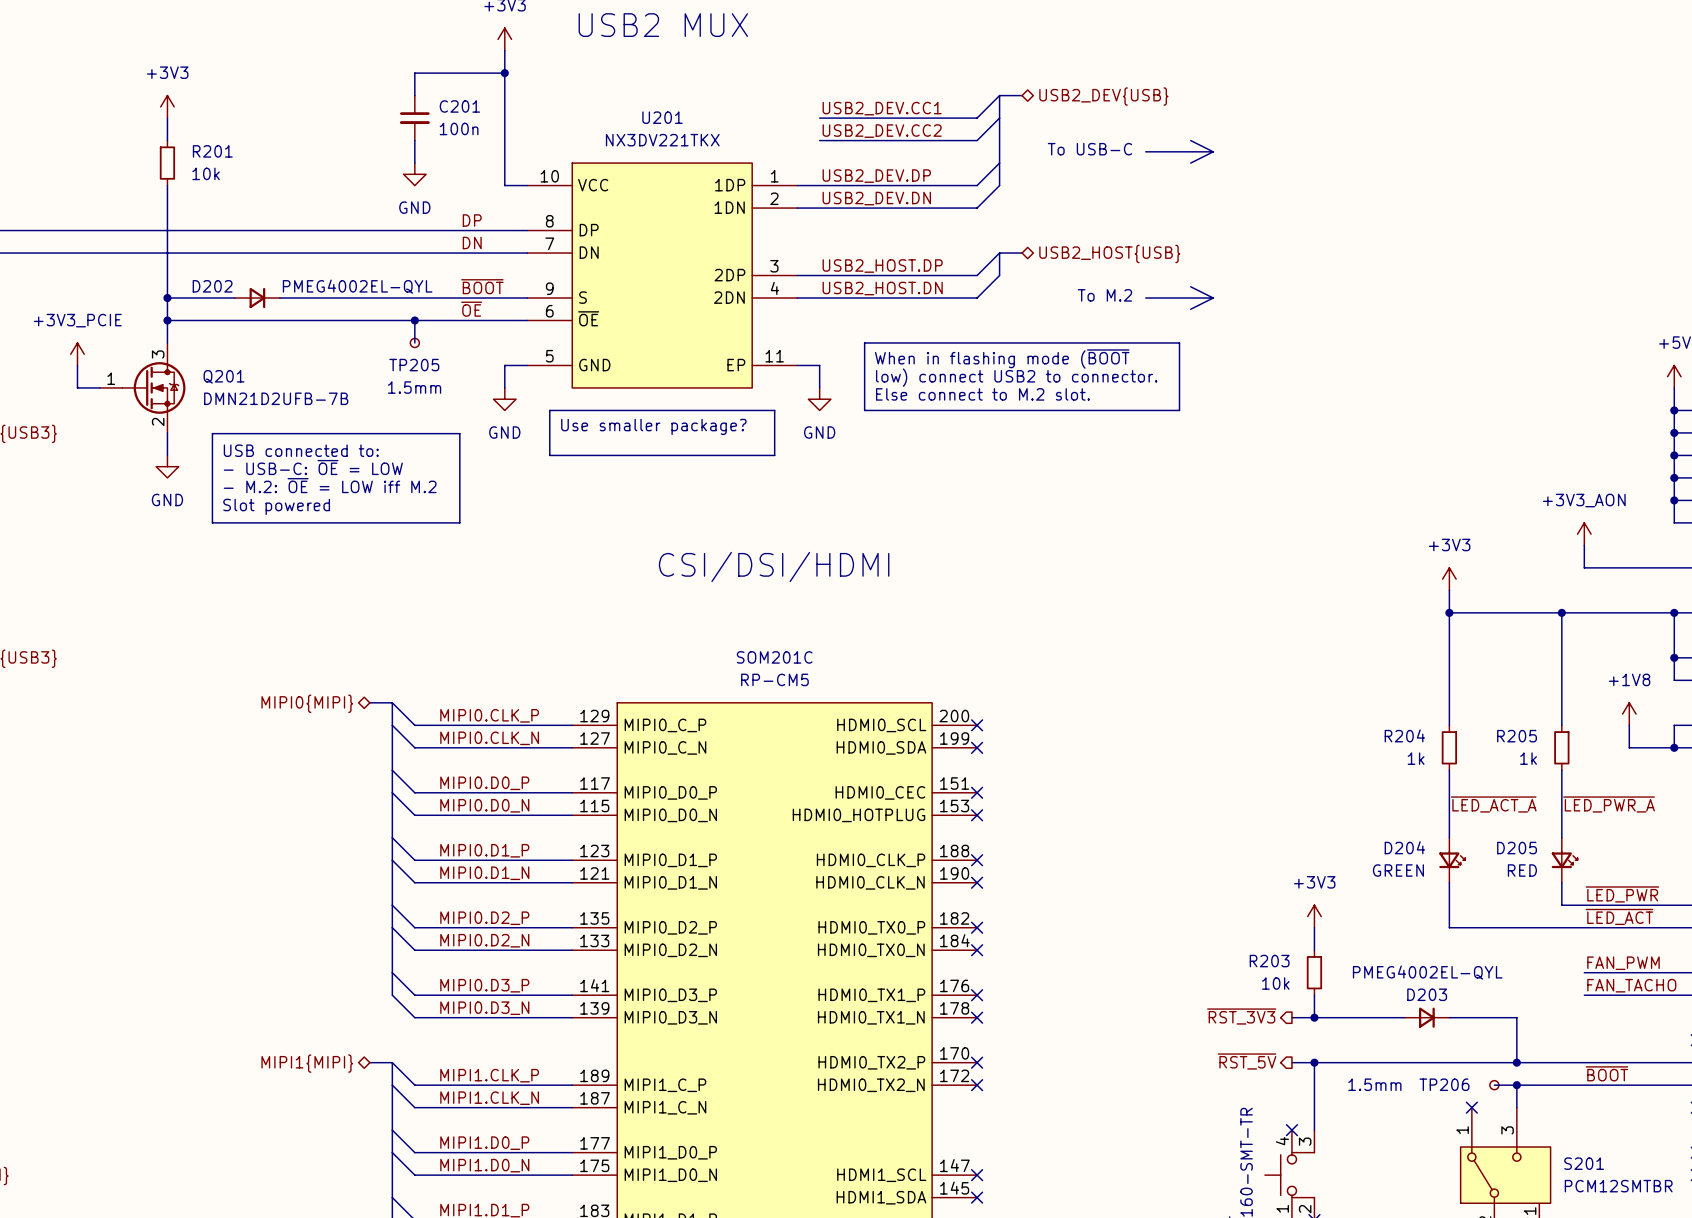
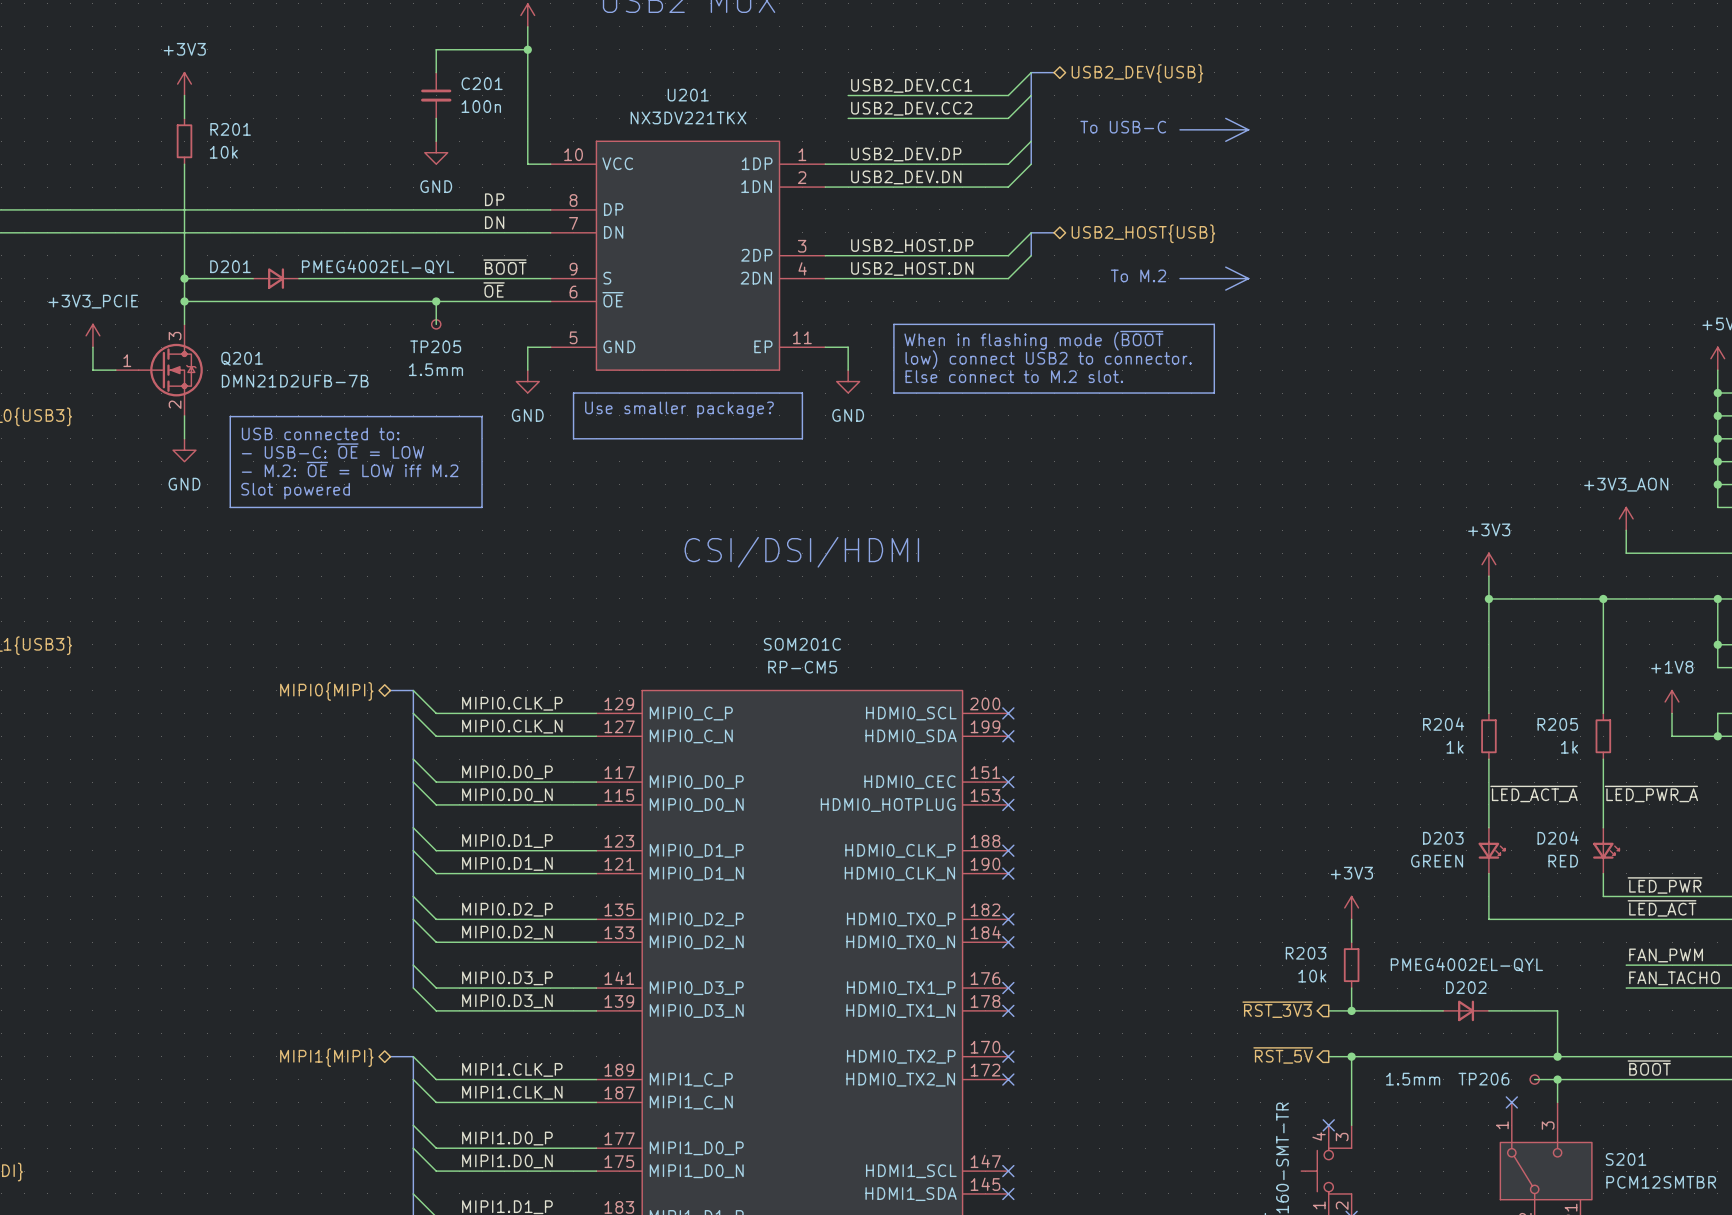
D202 name: D202 (212, 286) -> D201 (230, 266)
D204 name: D204 (1404, 847) -> D203 (1443, 838)
D205 name: D205 (1517, 848) -> D204 (1558, 837)
D203 name: D203 (1427, 994) -> D202 (1466, 987)

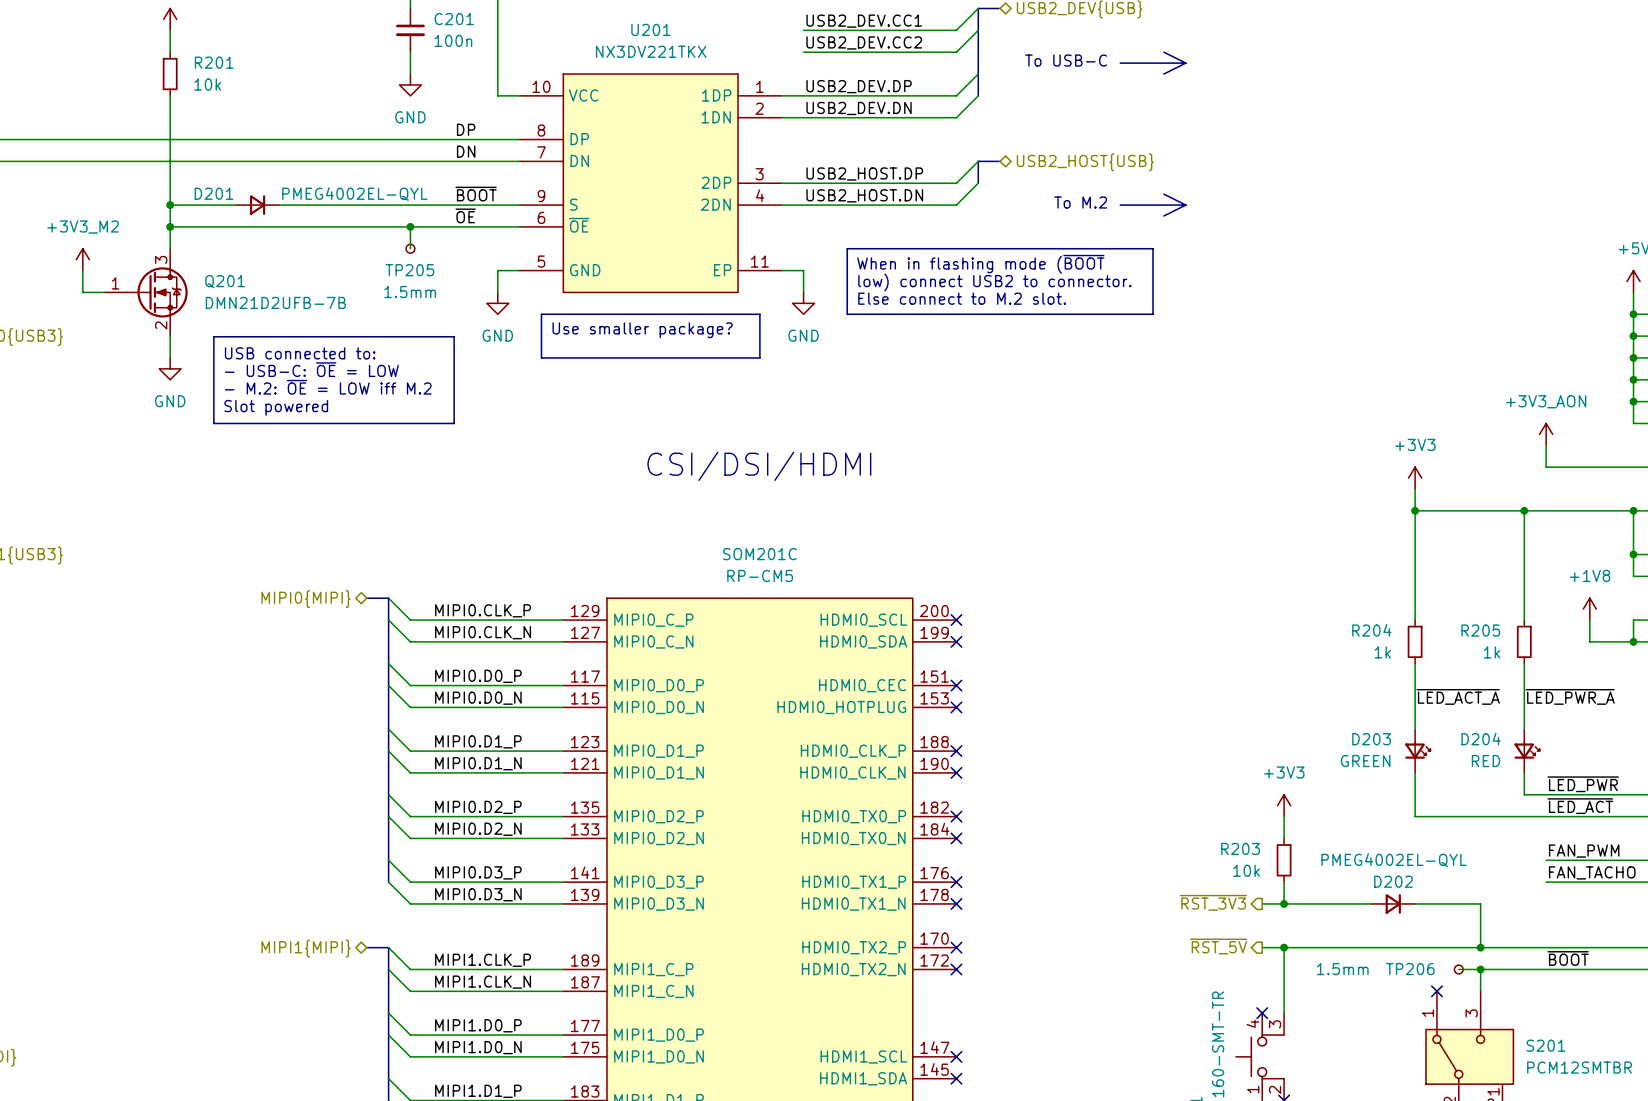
power symbol: +3V3_PCIE (92, 335) -> +3V3_M2 (82, 259)

